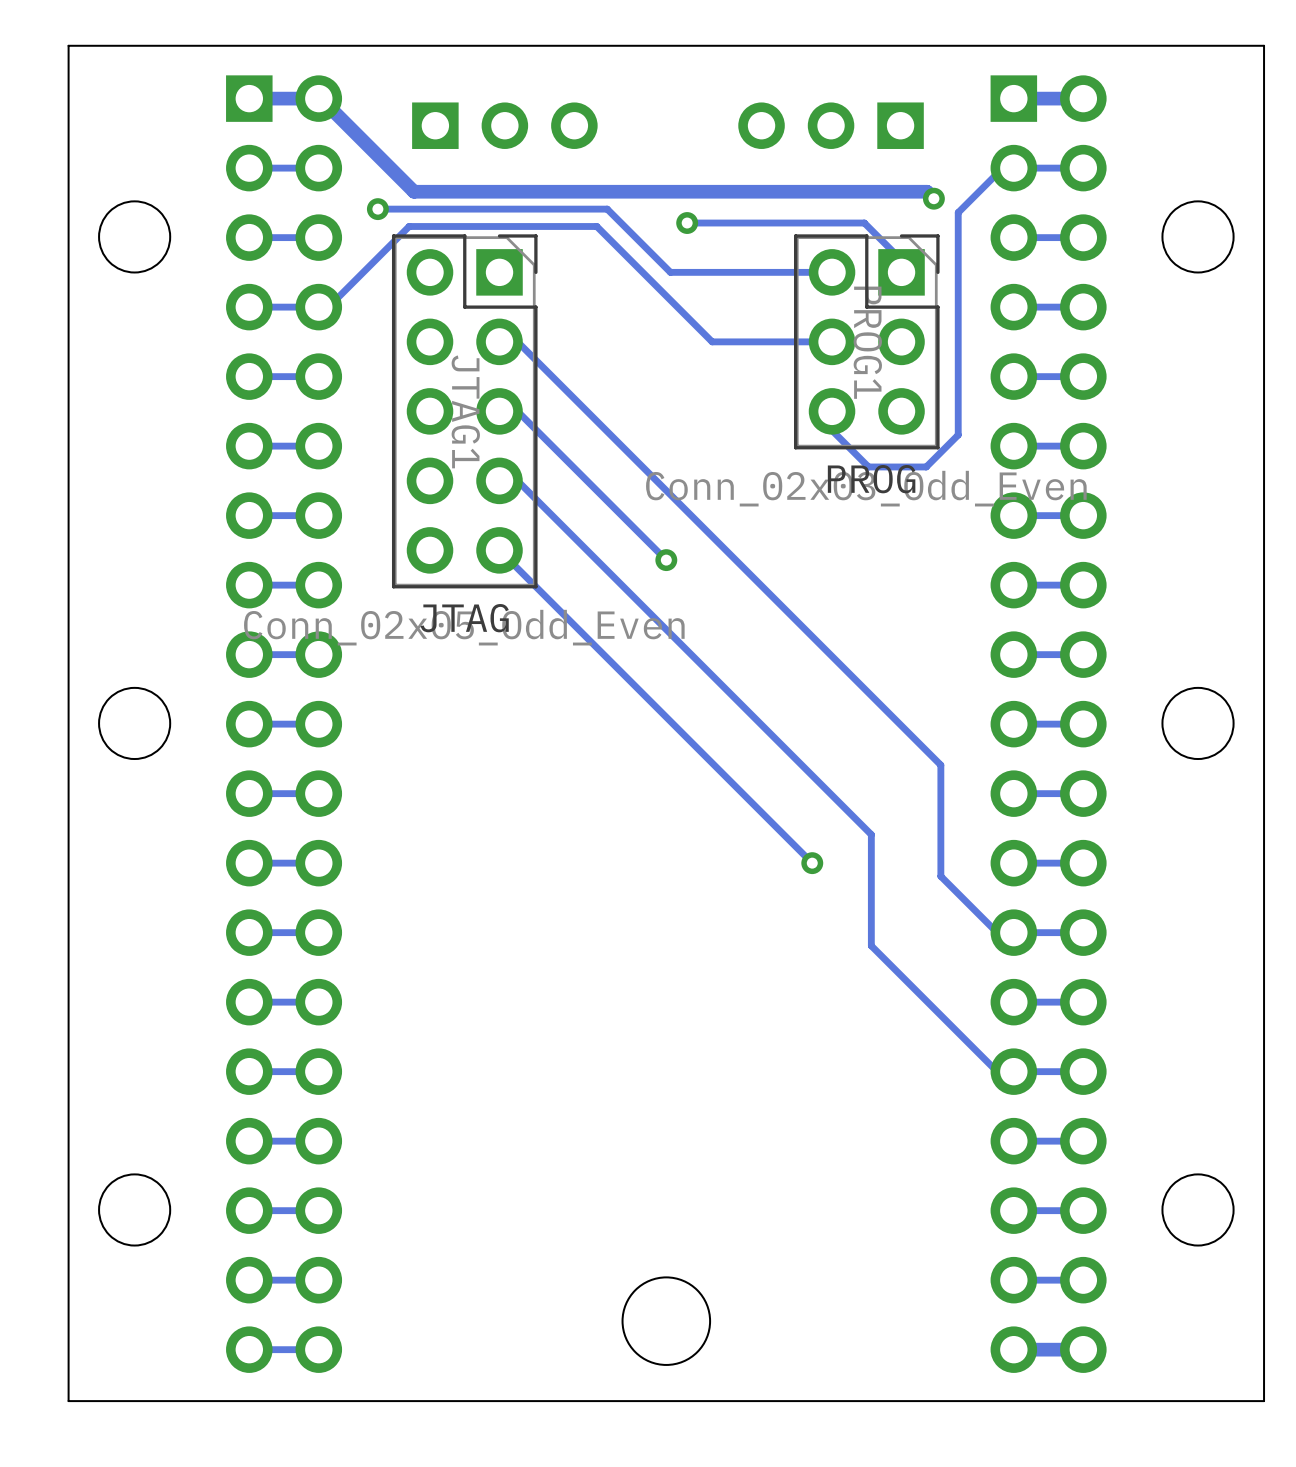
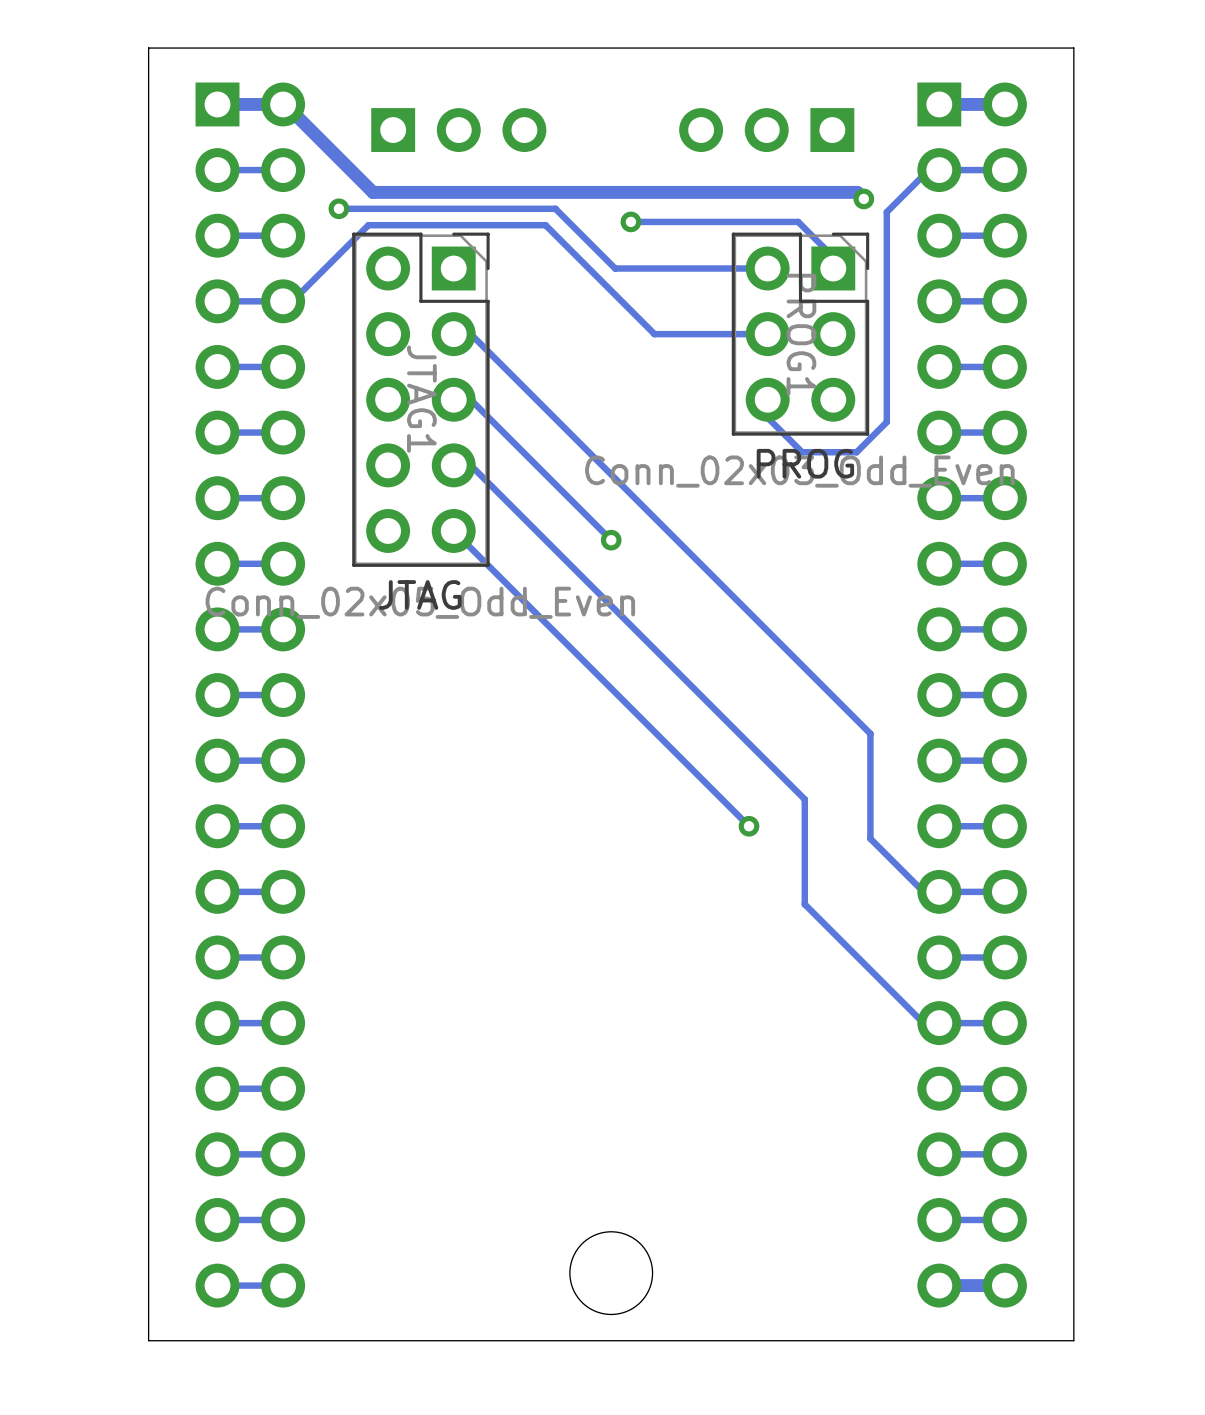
board edge: (1264, 45) (68, 45) (68, 1401) (1264, 1401) (1264, 45) -> (1073, 48) (1073, 1340) (148, 1340) (148, 48) (1073, 48)
round board edge: [98, 200, 171, 274] -> none
round board edge: [1161, 200, 1235, 274] -> none
round board edge: [98, 687, 171, 760] -> none
round board edge: [1161, 687, 1235, 760] -> none
round board edge: [98, 1173, 171, 1247] -> none
round board edge: [1161, 1173, 1235, 1247] -> none
round board edge position: (666, 1321) -> (611, 1273)

